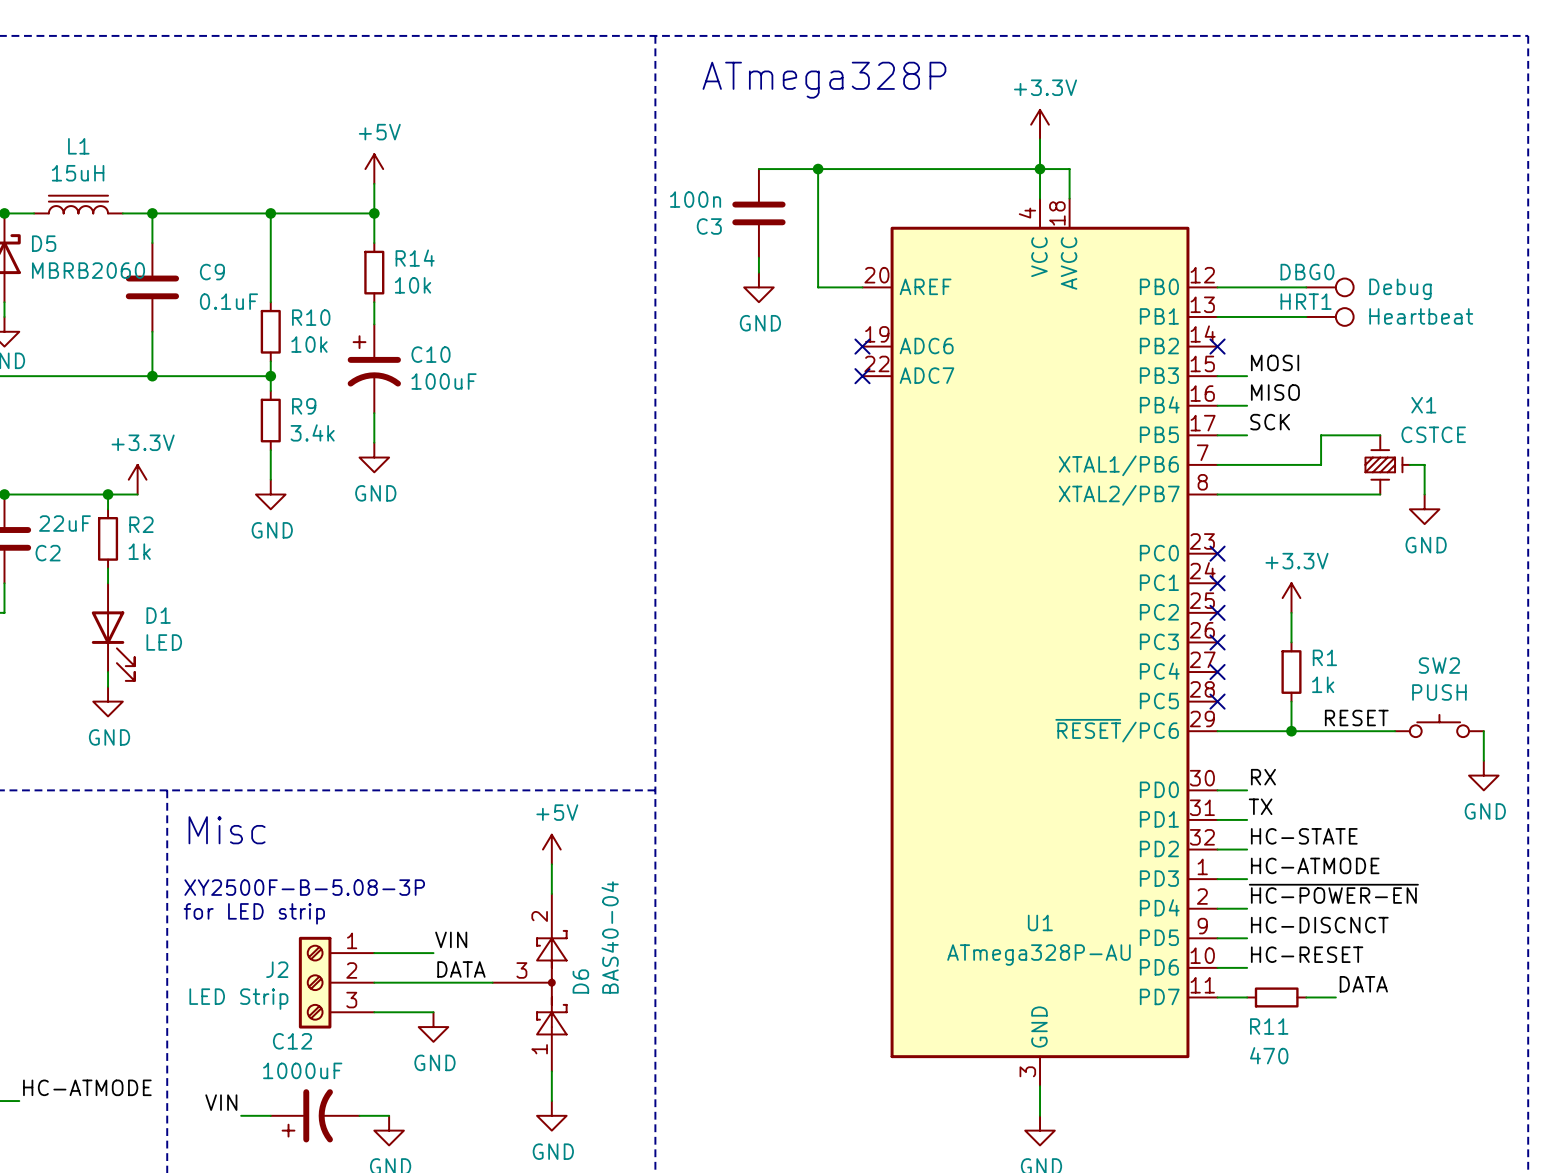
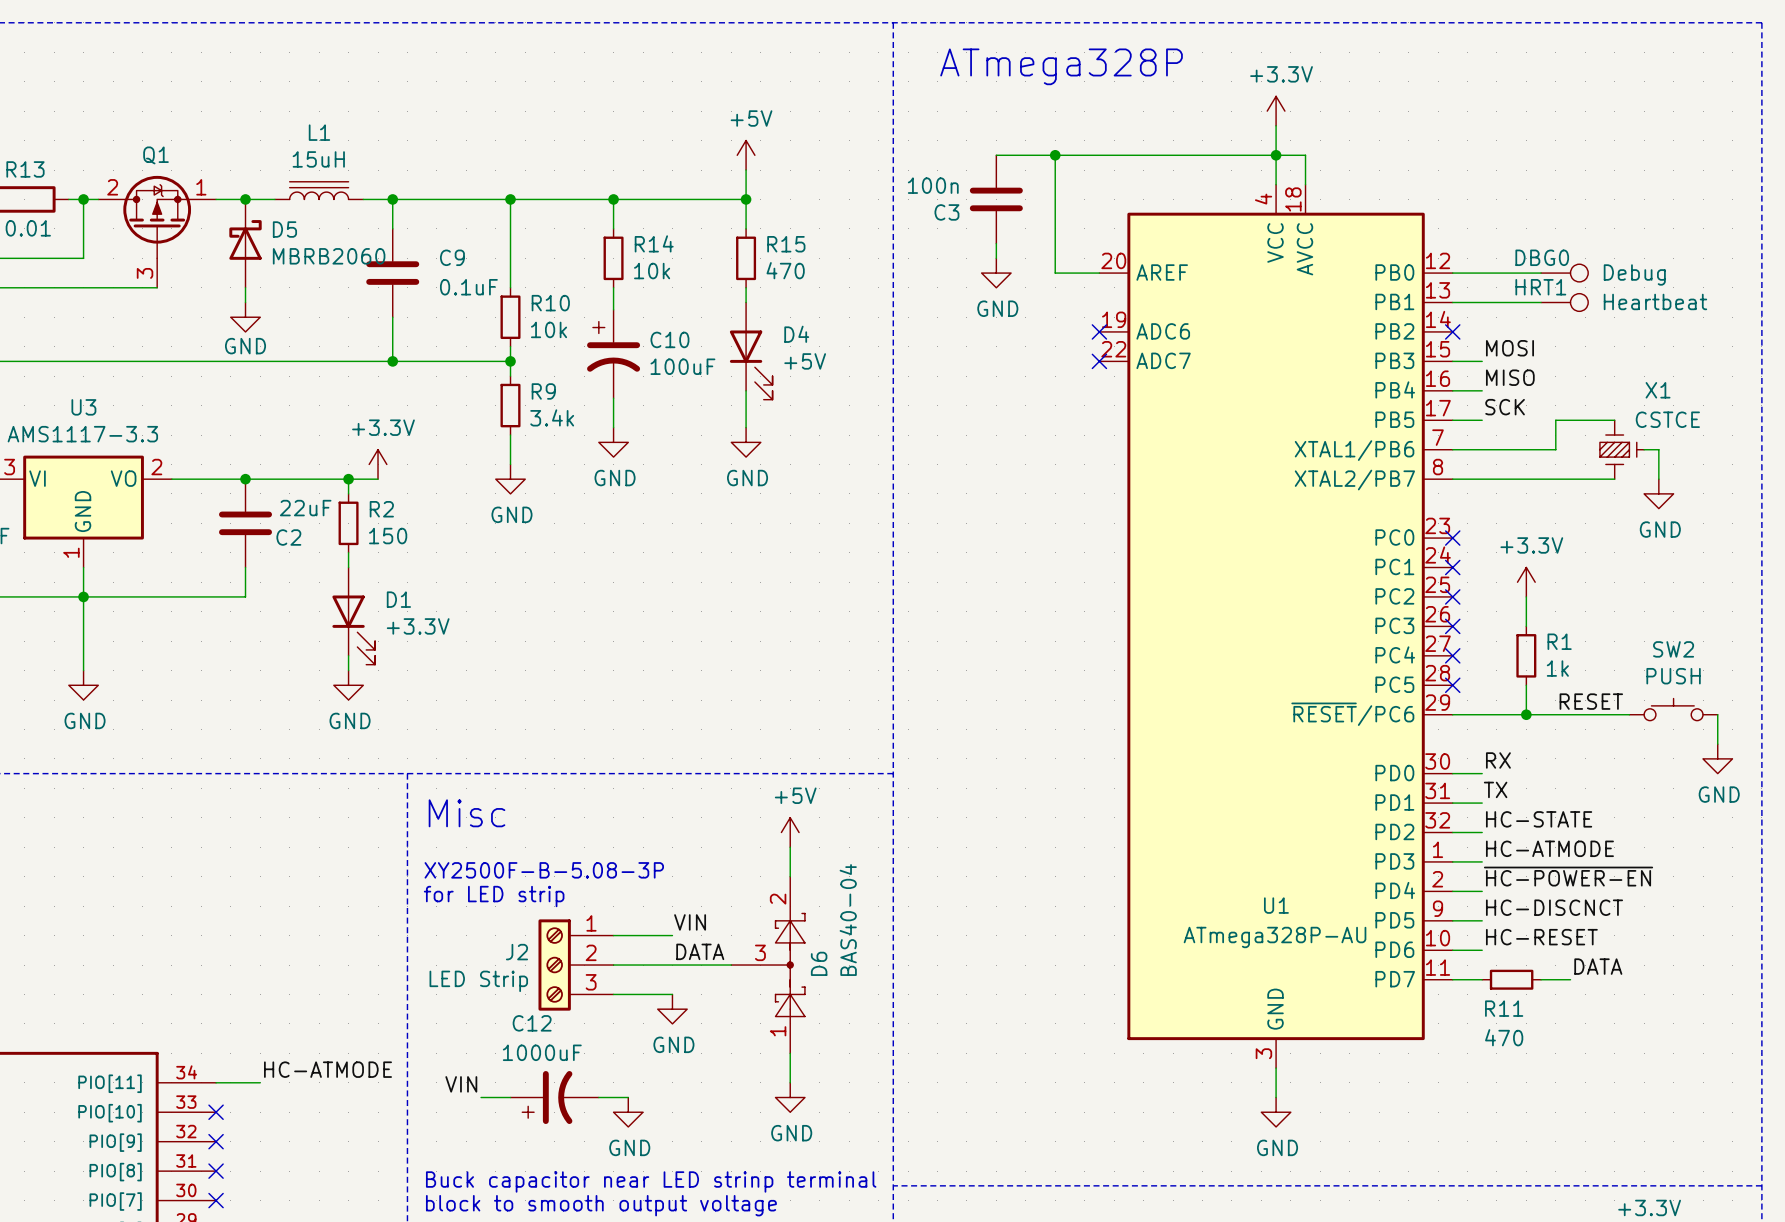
power symbol position: +5V (374, 169) -> +5V (746, 155)
wire: (374, 183) (374, 213) -> (746, 199) (613, 199)
wire: none -> (746, 170) (746, 228)
junction: none -> (746, 199)
R15: none -> 470 (746, 258)
wire: none -> (746, 287) (746, 302)
D4: none -> +5V (751, 351)
wire: none -> (746, 390) (746, 427)
power symbol: none -> GND (746, 442)
R2 value: 1k (139, 551) -> 150 (388, 536)
D1 value: LED (164, 642) -> +3.3V (418, 626)

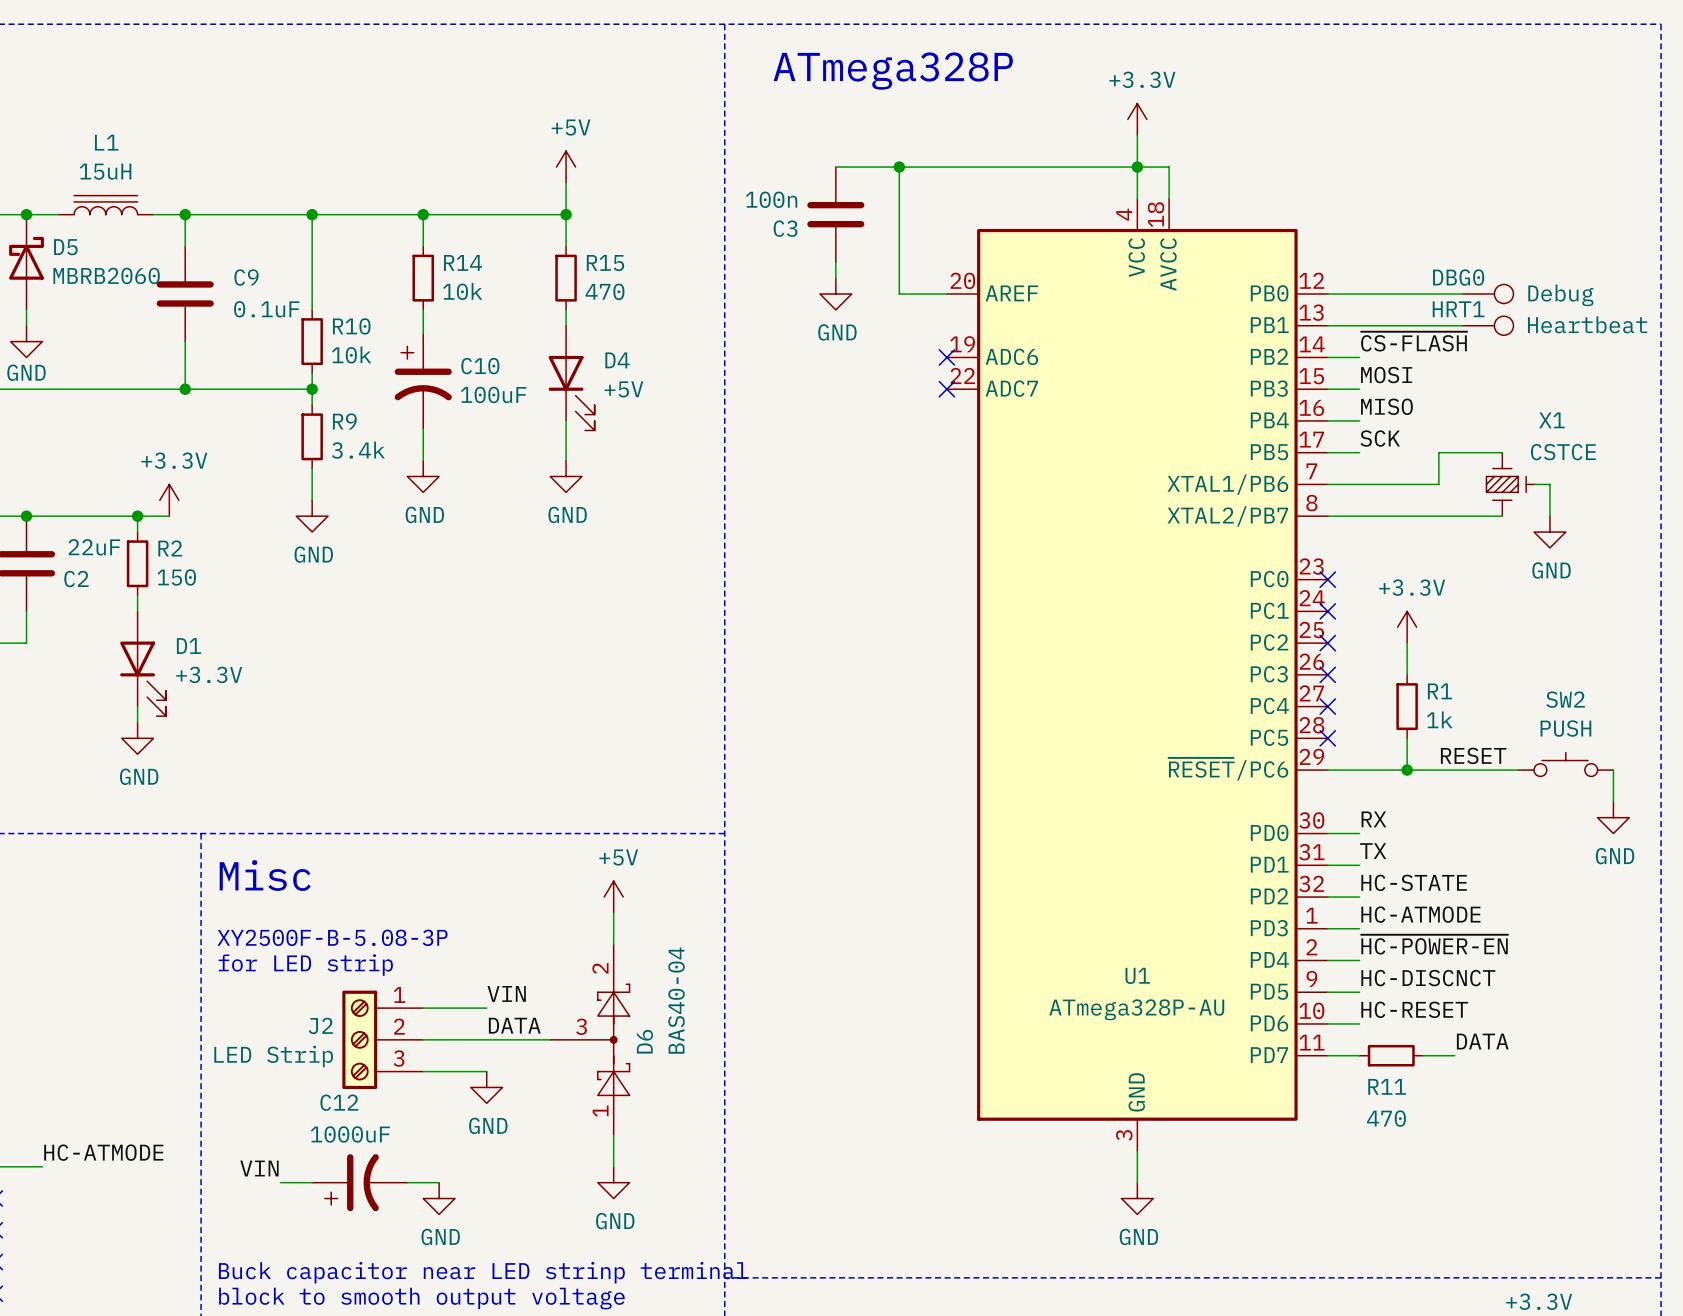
DBG0 position: (1564, 273) -> (1488, 294)
HRT1 position: (1564, 302) -> (1488, 325)
label: none -> ~{CS-FLASH} (1414, 341)
wire: none -> (1327, 357) (1359, 357)
no-connect mark: (1452, 331) -> none

